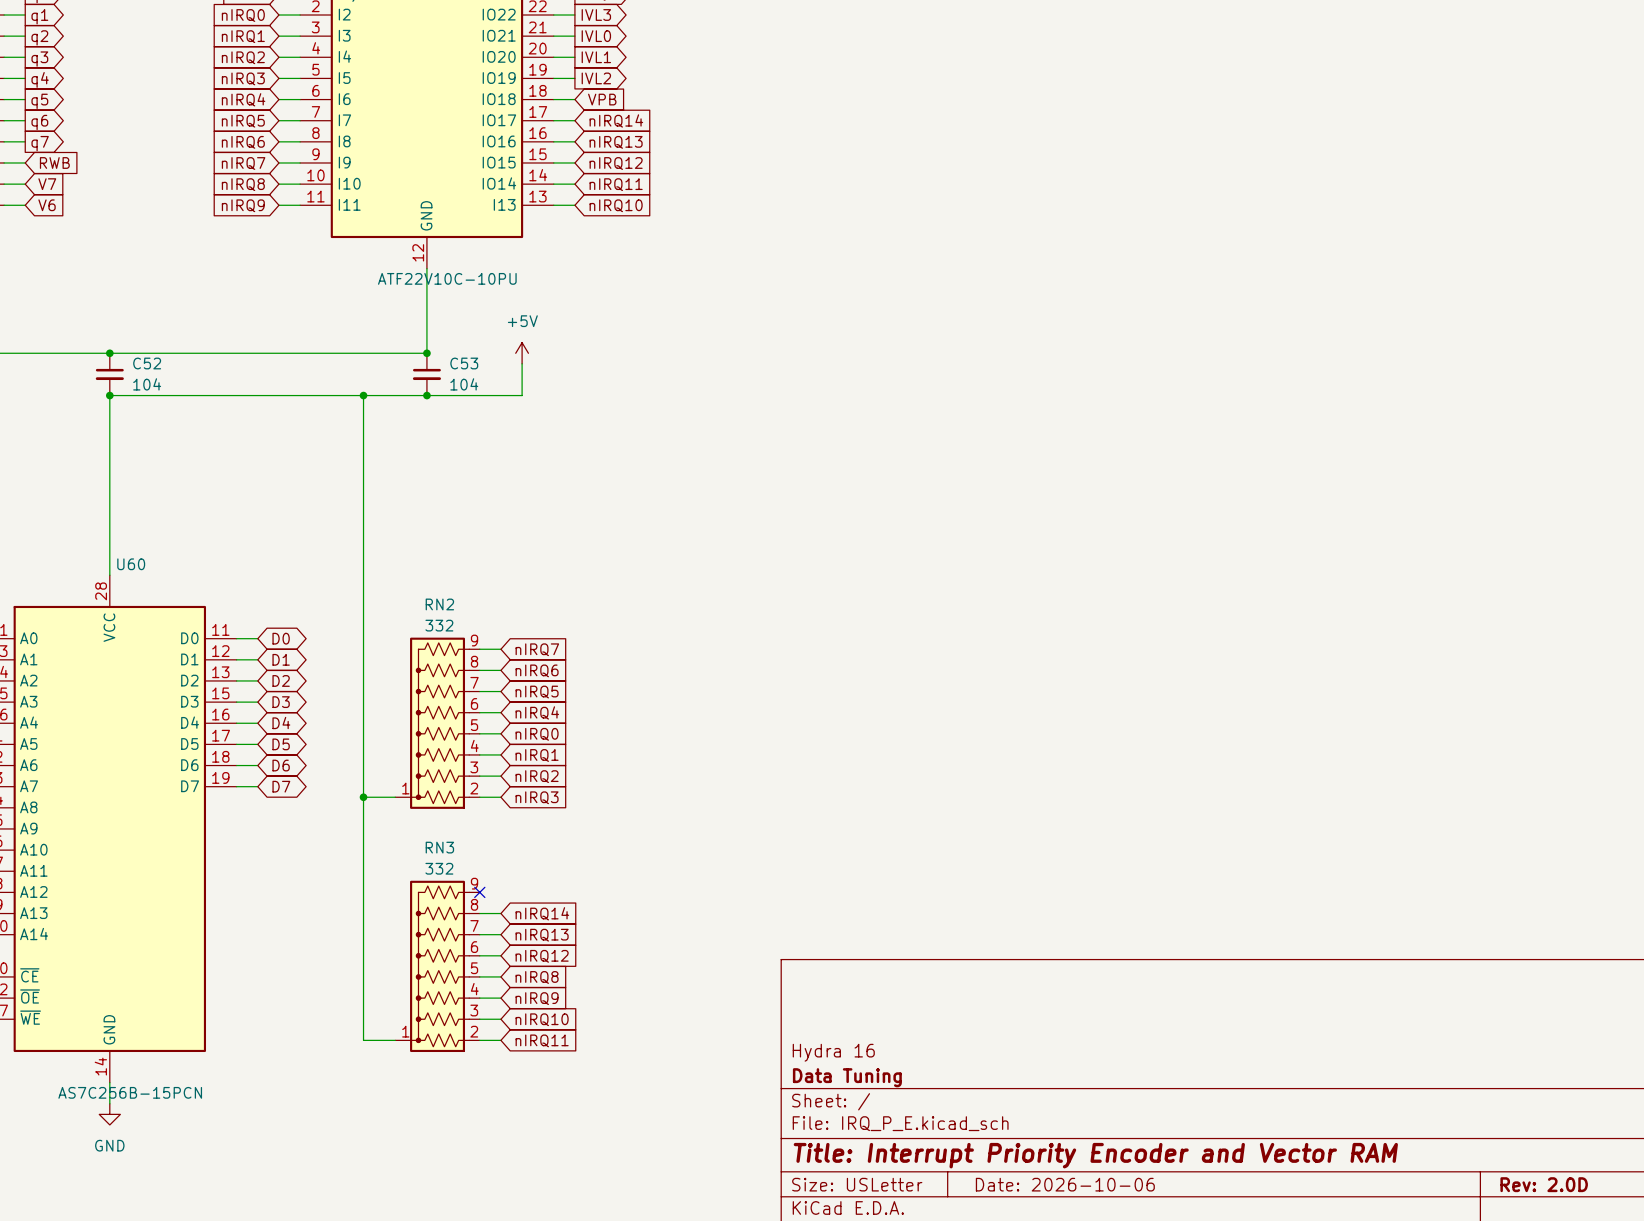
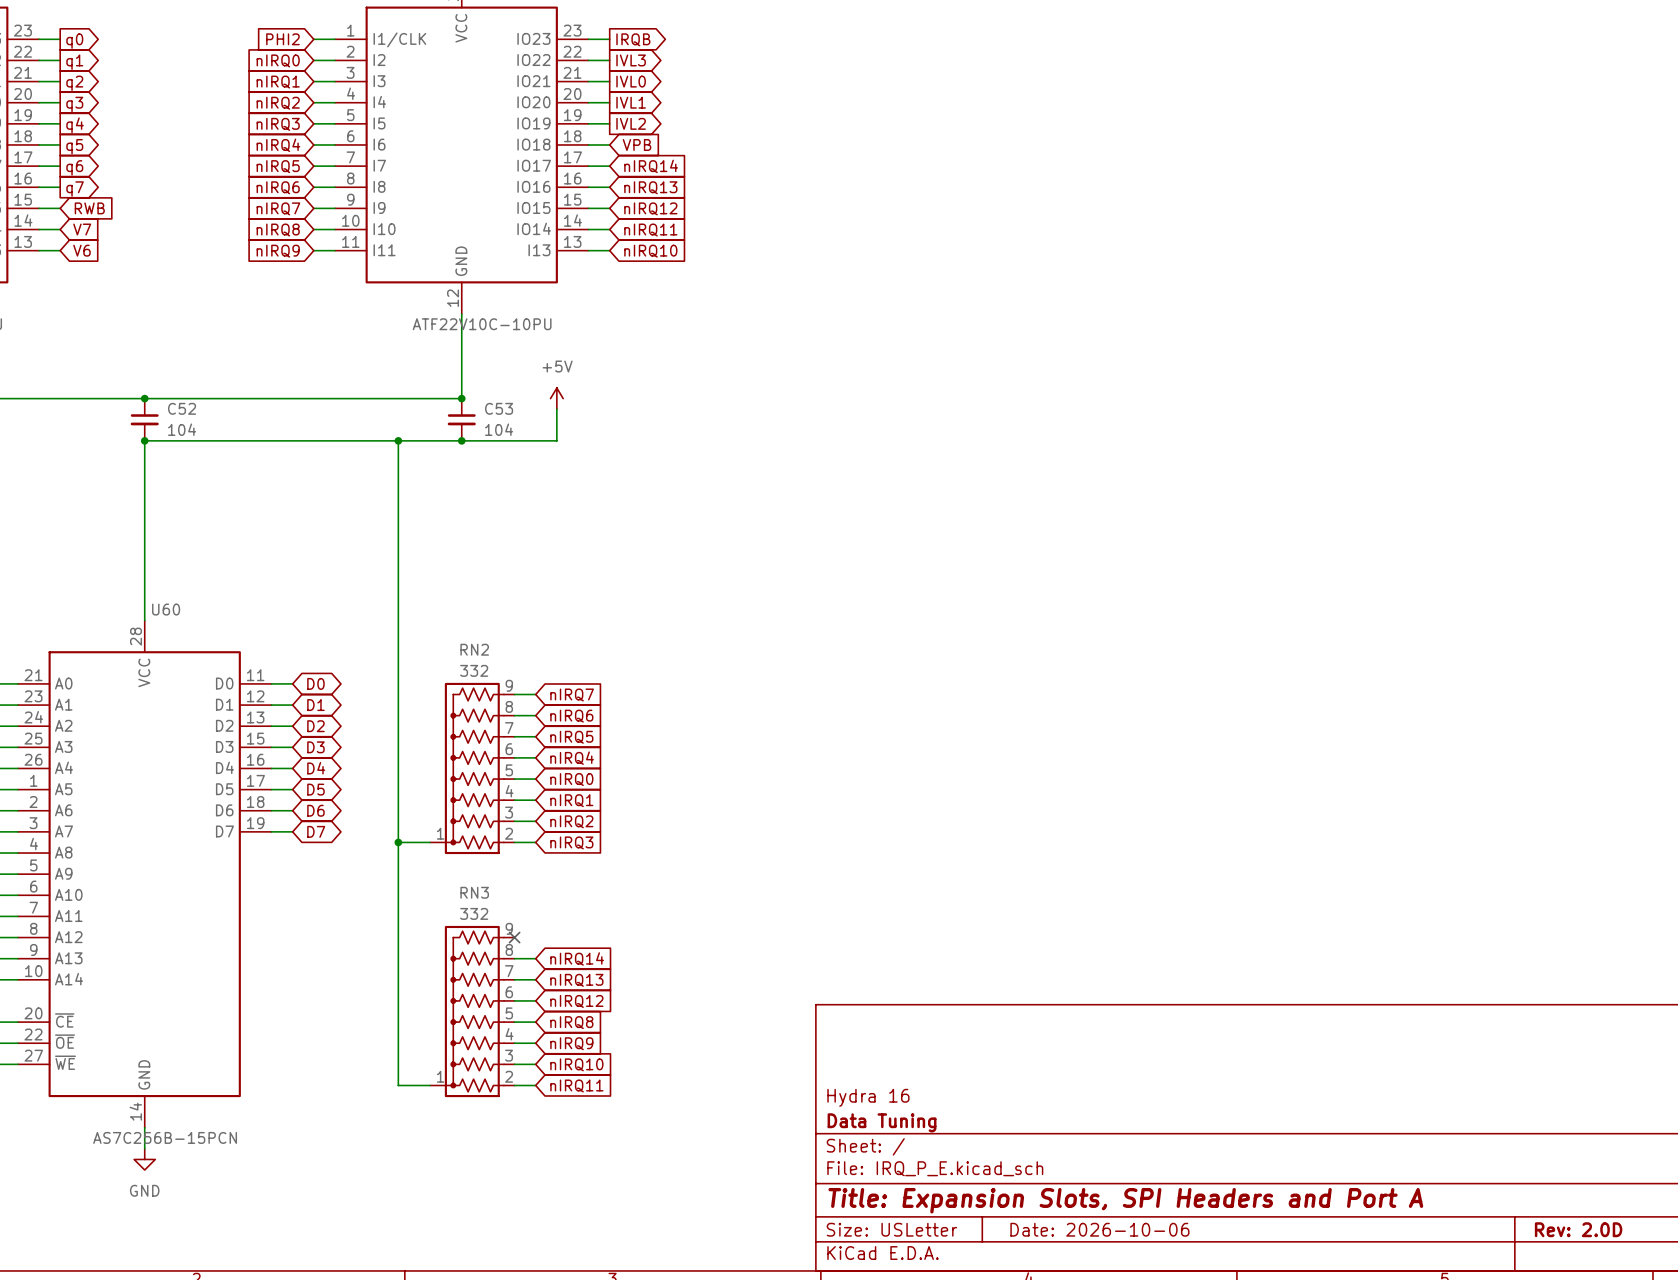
title block: Title: Interrupt Priority Encoder and Vector RAM (1095, 1155) -> Title: Expansion Slots, SPI Headers and Port A (1125, 1200)

